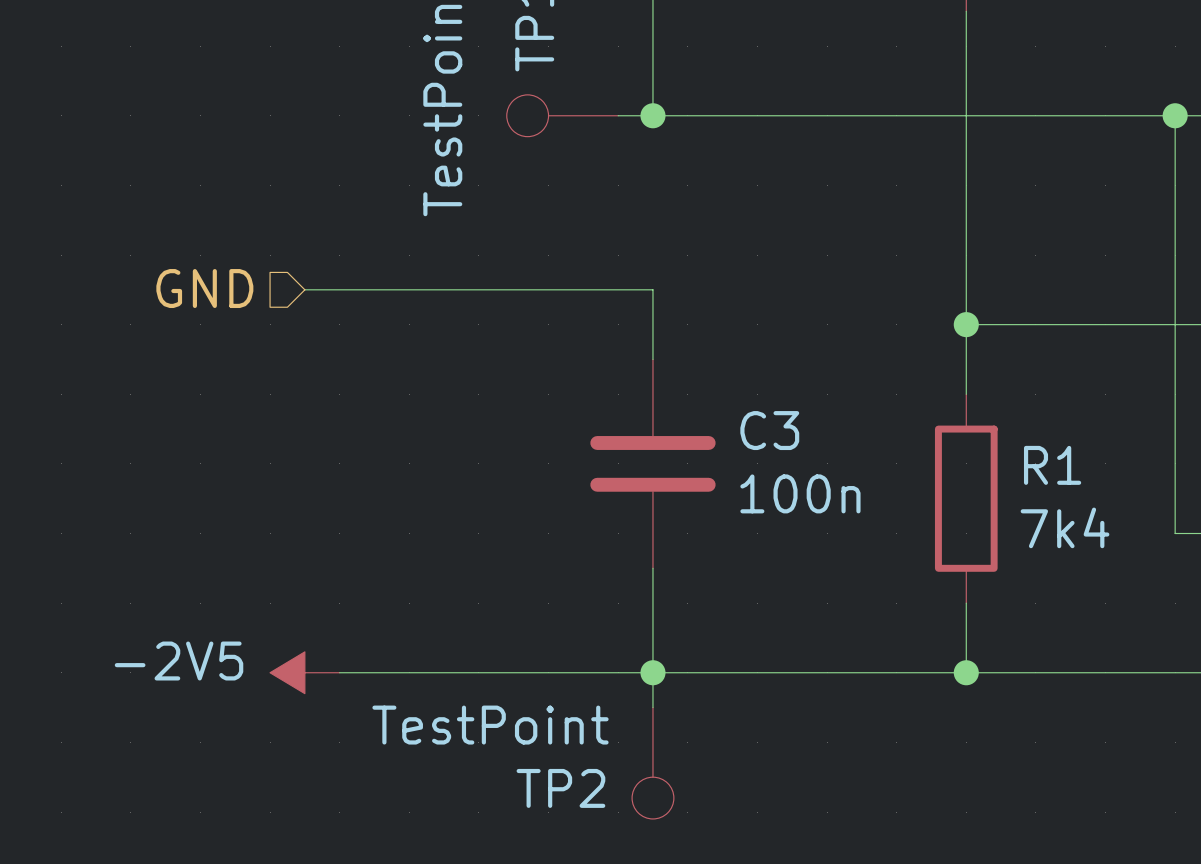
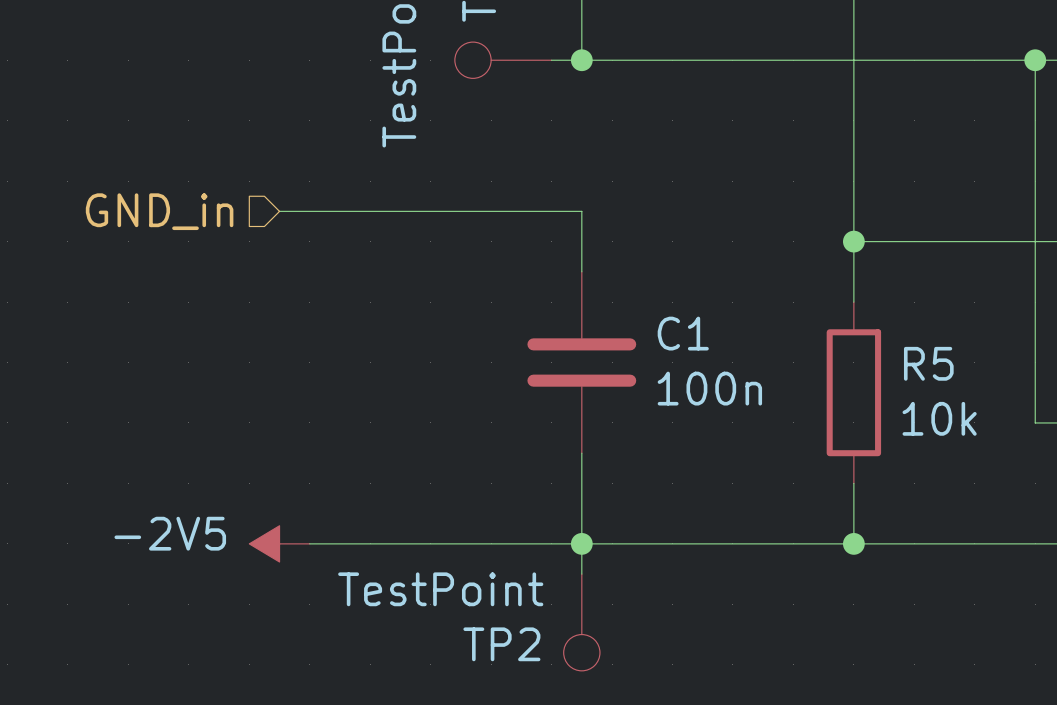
hierarchical label: GND (204, 288) -> GND_in (159, 211)
C3 name: C3 (769, 430) -> C1 (683, 333)
R1 name: R1 (1052, 465) -> R5 (928, 363)
R1 value: 7k4 (1065, 527) -> 10k (939, 418)

